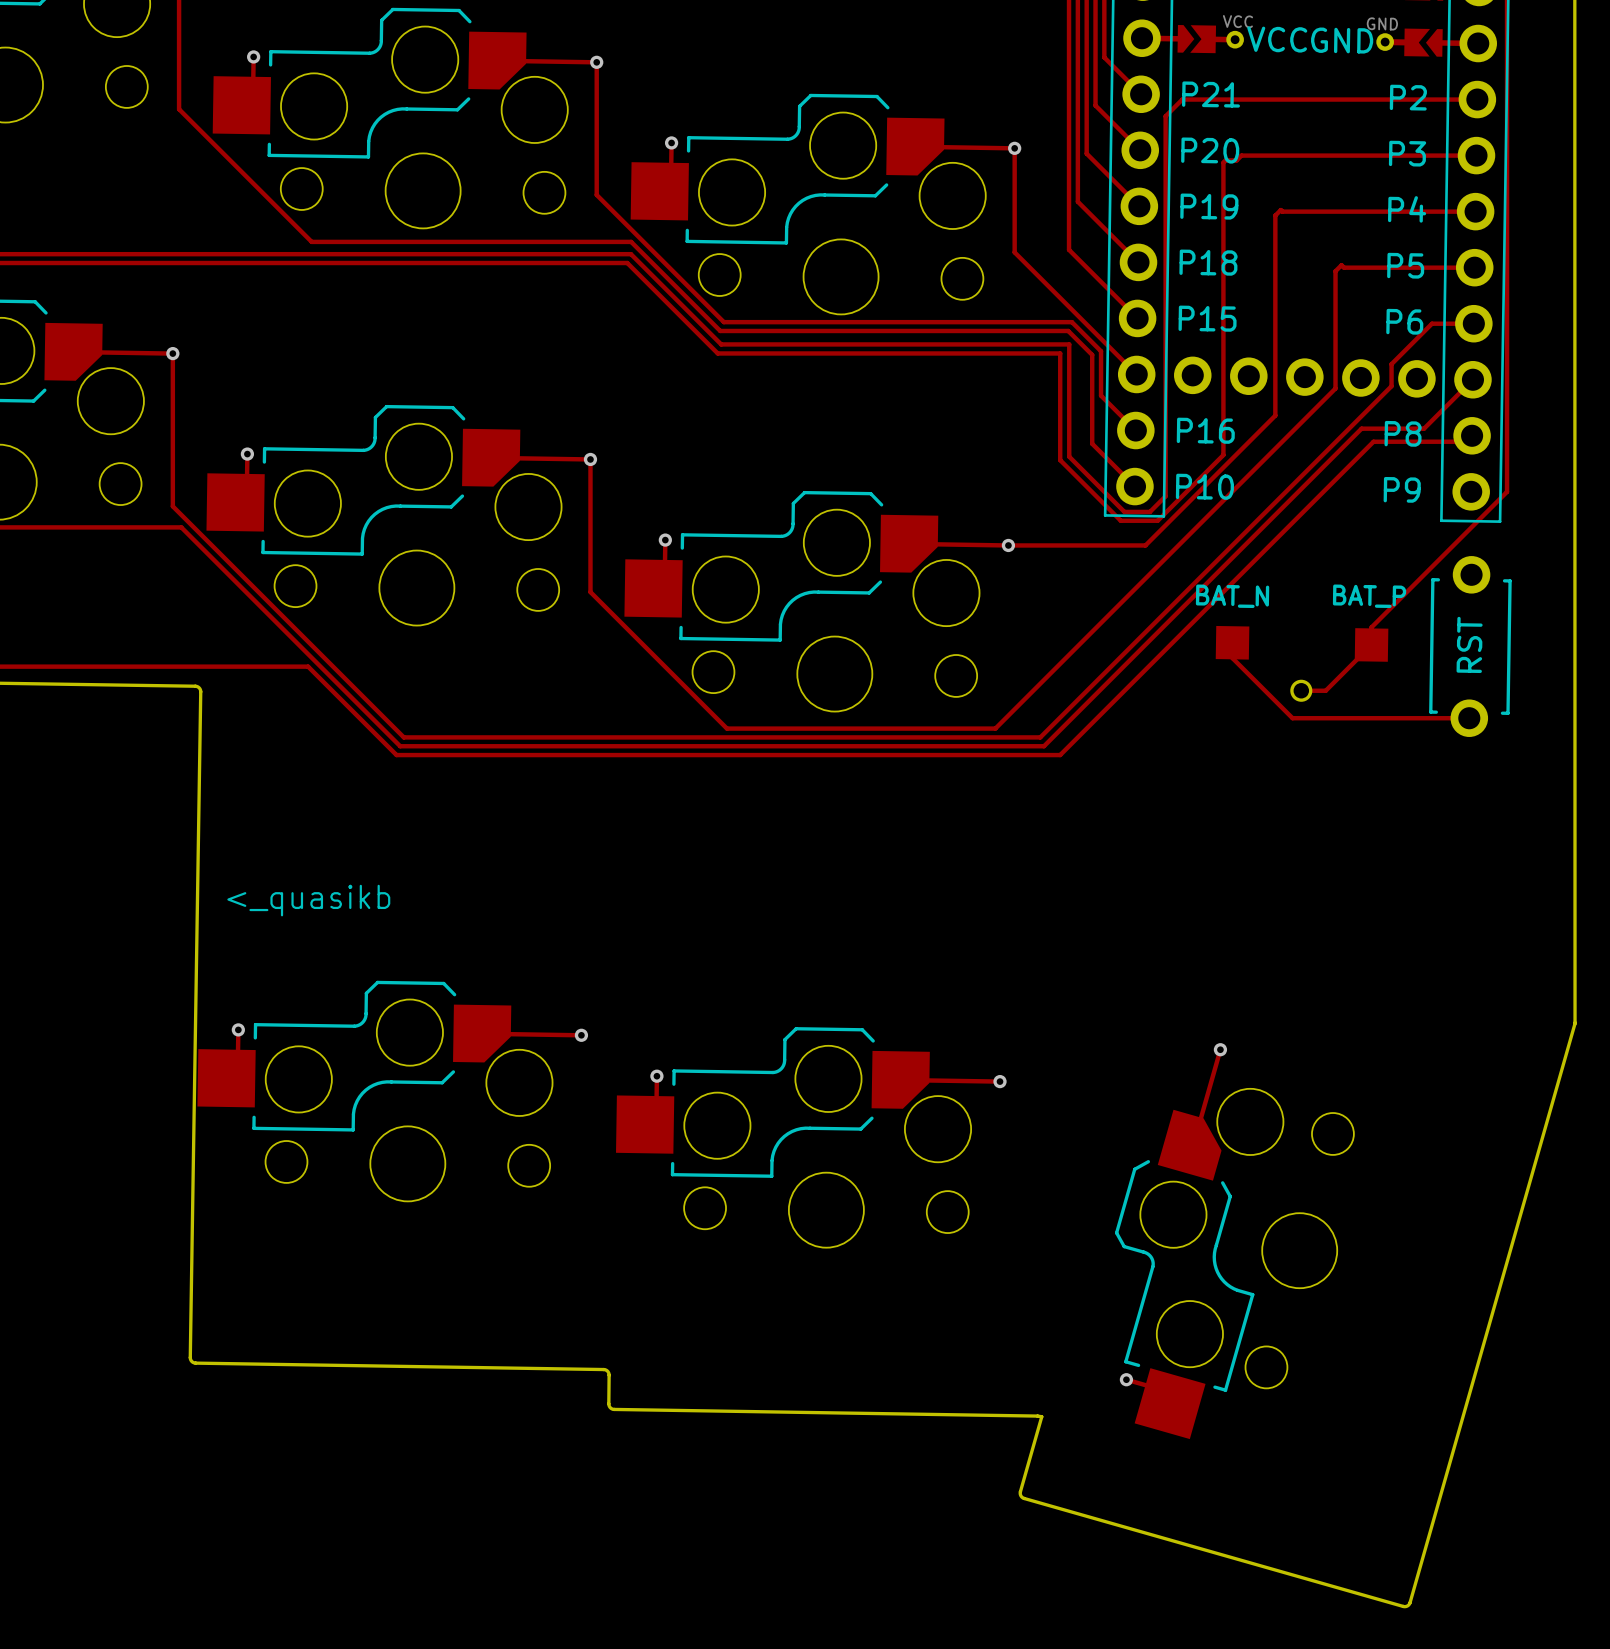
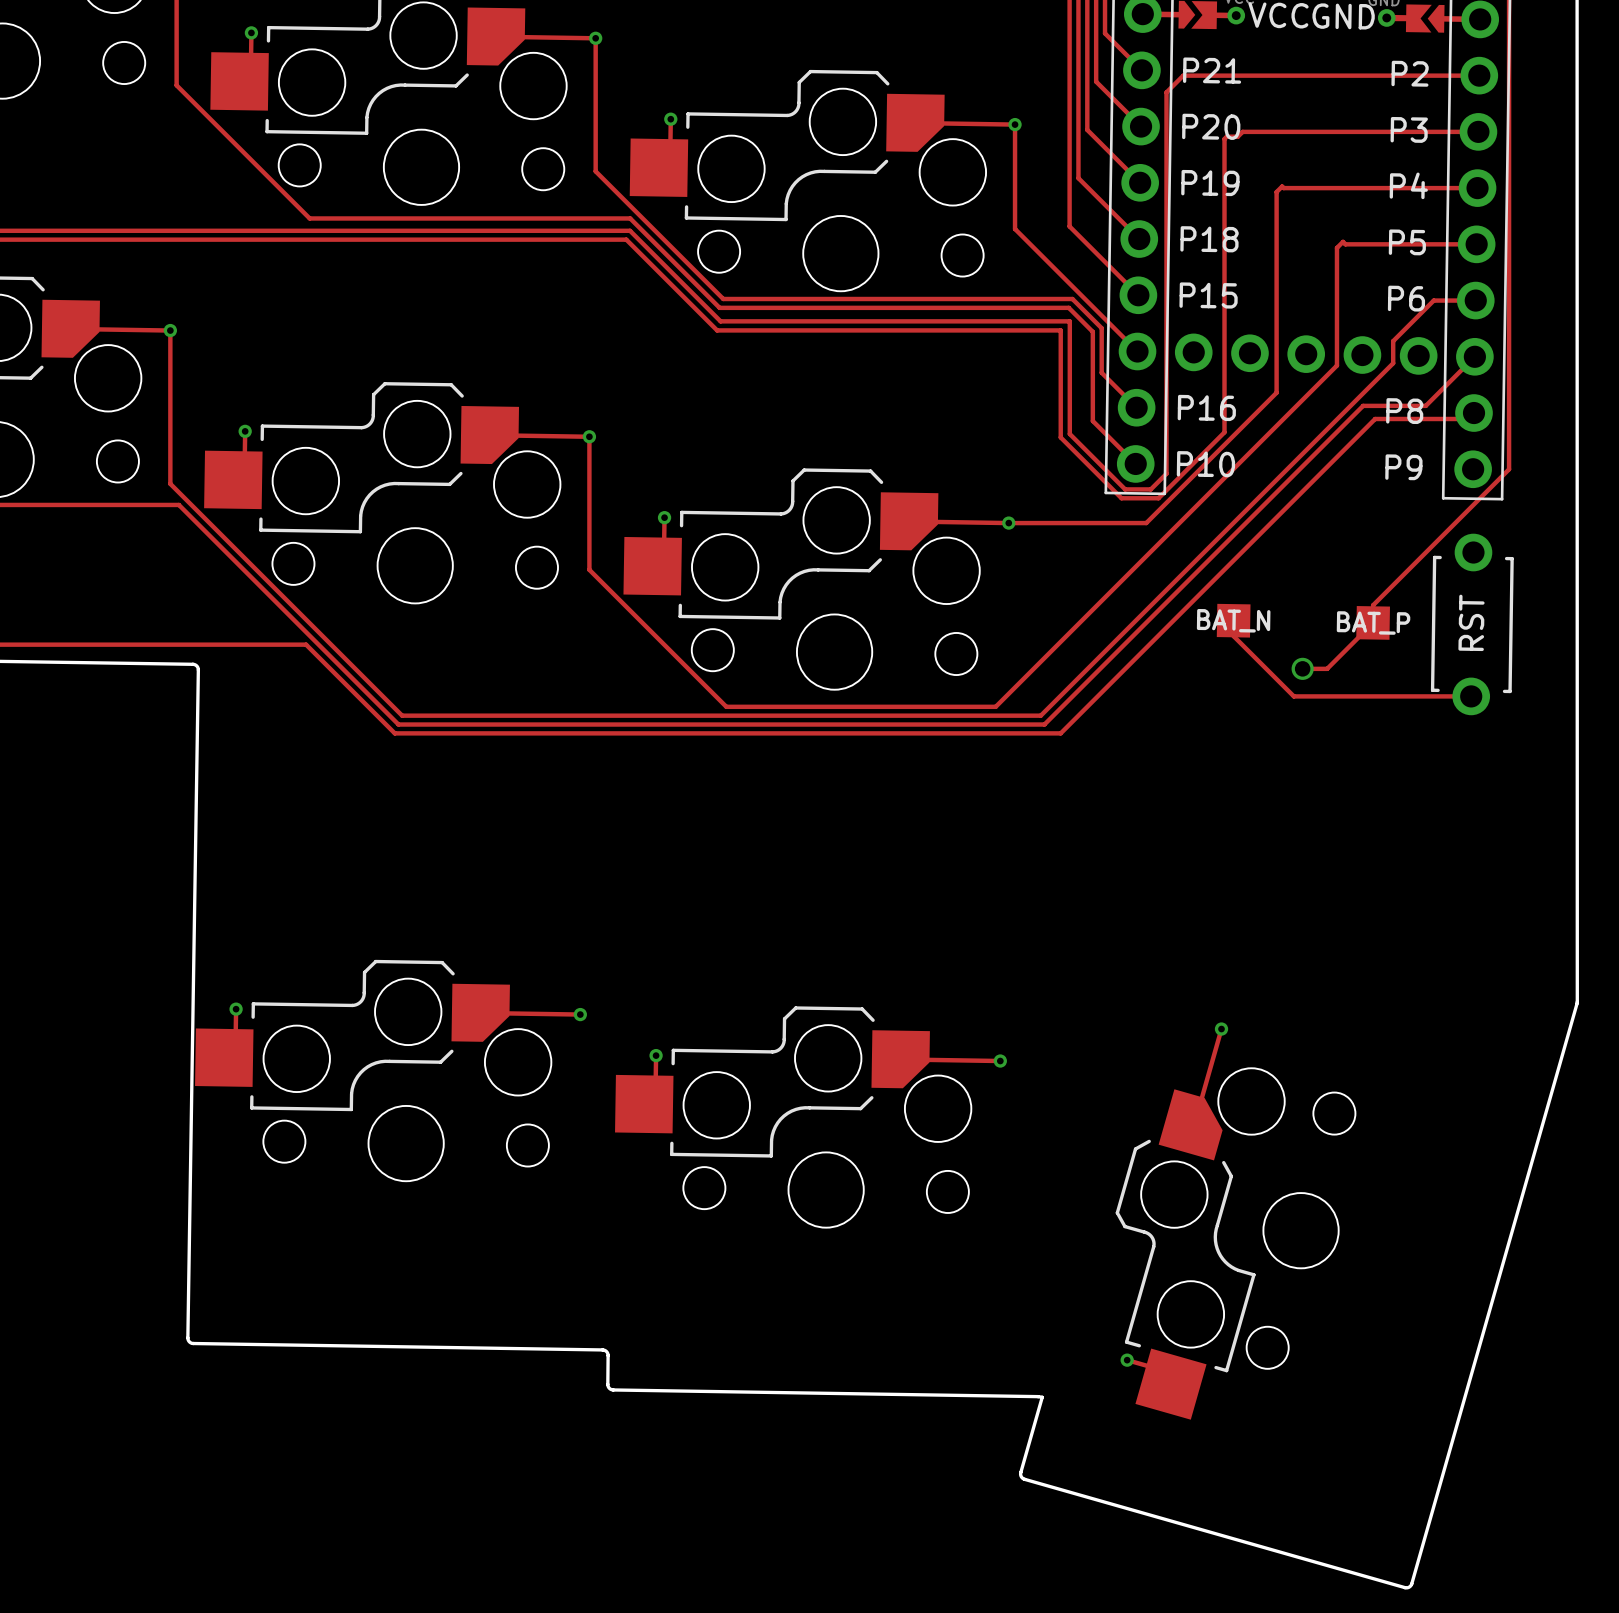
part text position: BAT_N (1232, 596) -> BAT_N (1233, 620)
part text position: BAT_P (1369, 596) -> BAT_P (1373, 622)
text: <_quasikb (308, 900) -> none

